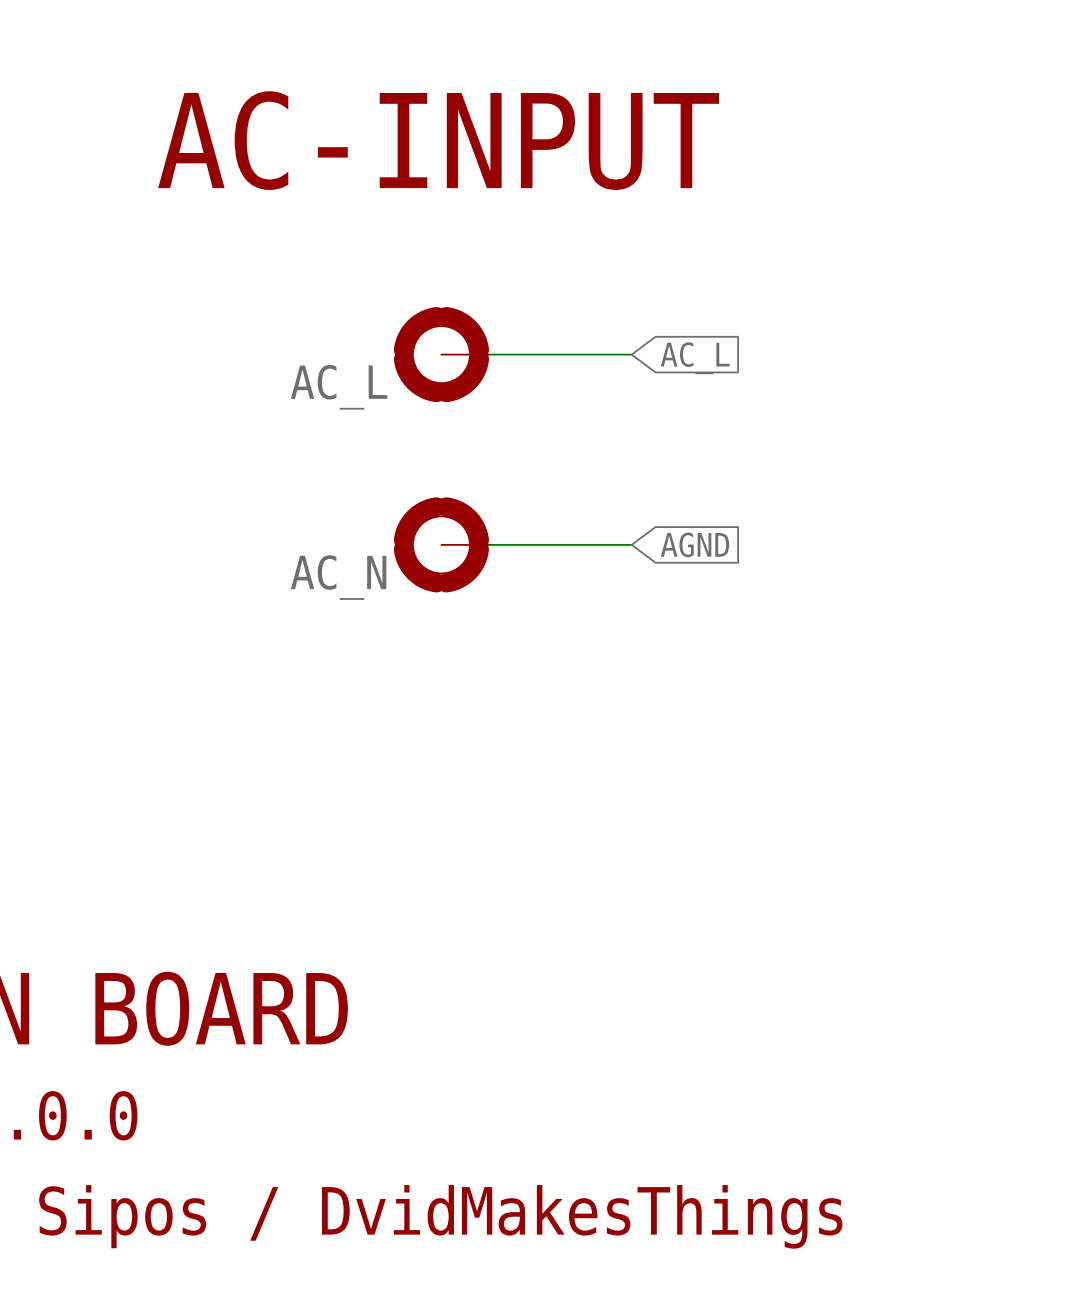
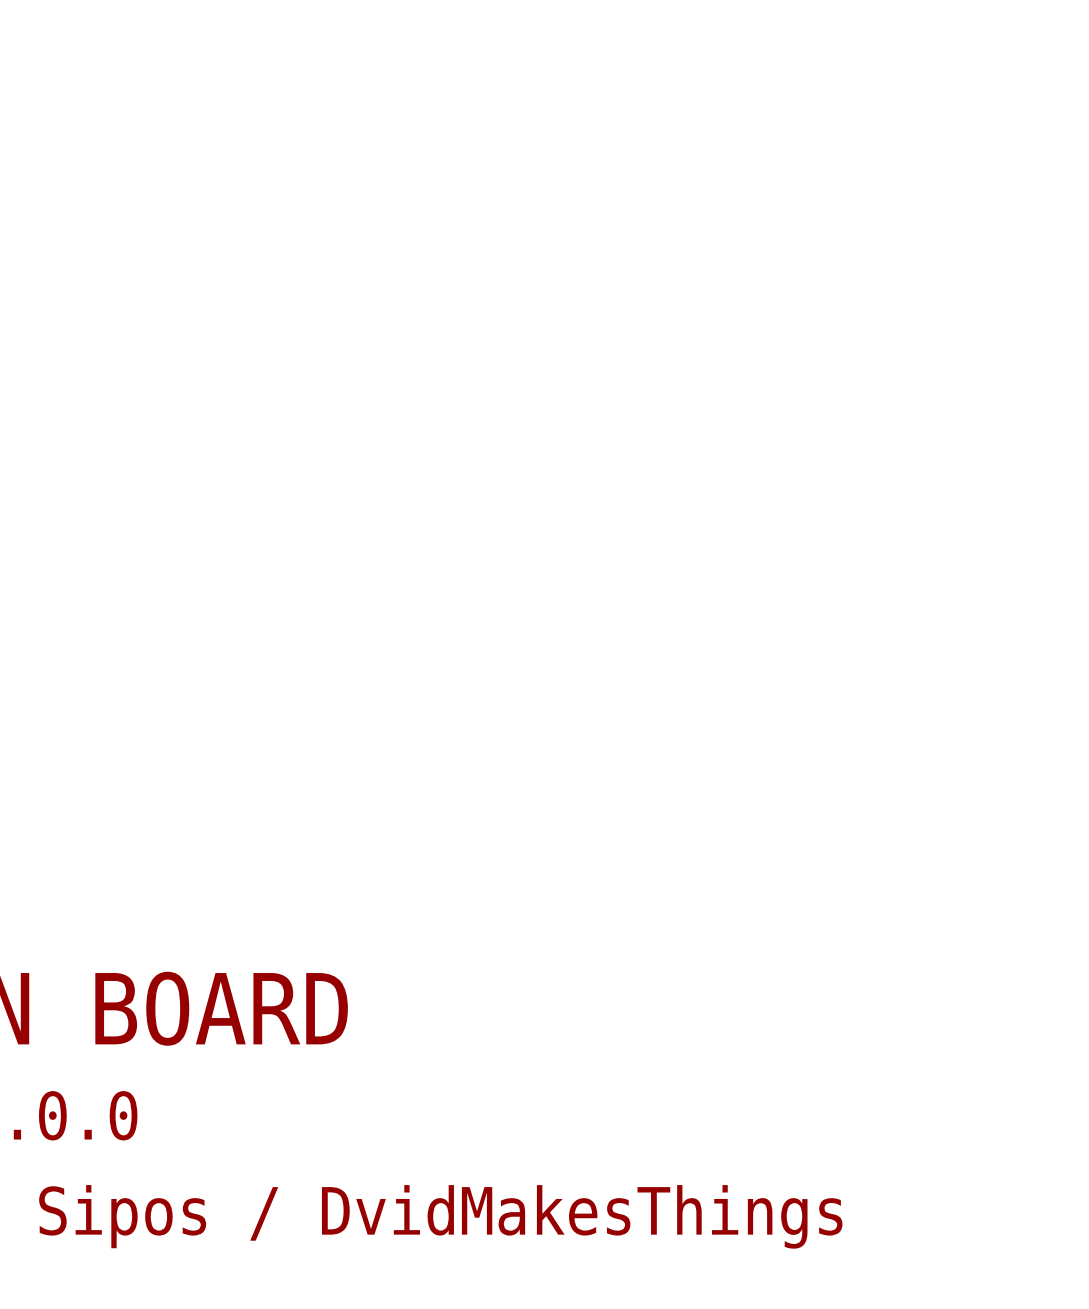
text: AC-INPUT (438, 140) -> none
AC_L: (441, 354) -> none
wire: (489, 354) (631, 354) -> none
global label: AC_L (695, 358) -> none
AC_N: (441, 544) -> none
wire: (489, 544) (631, 544) -> none
global label: AGND (694, 544) -> none

